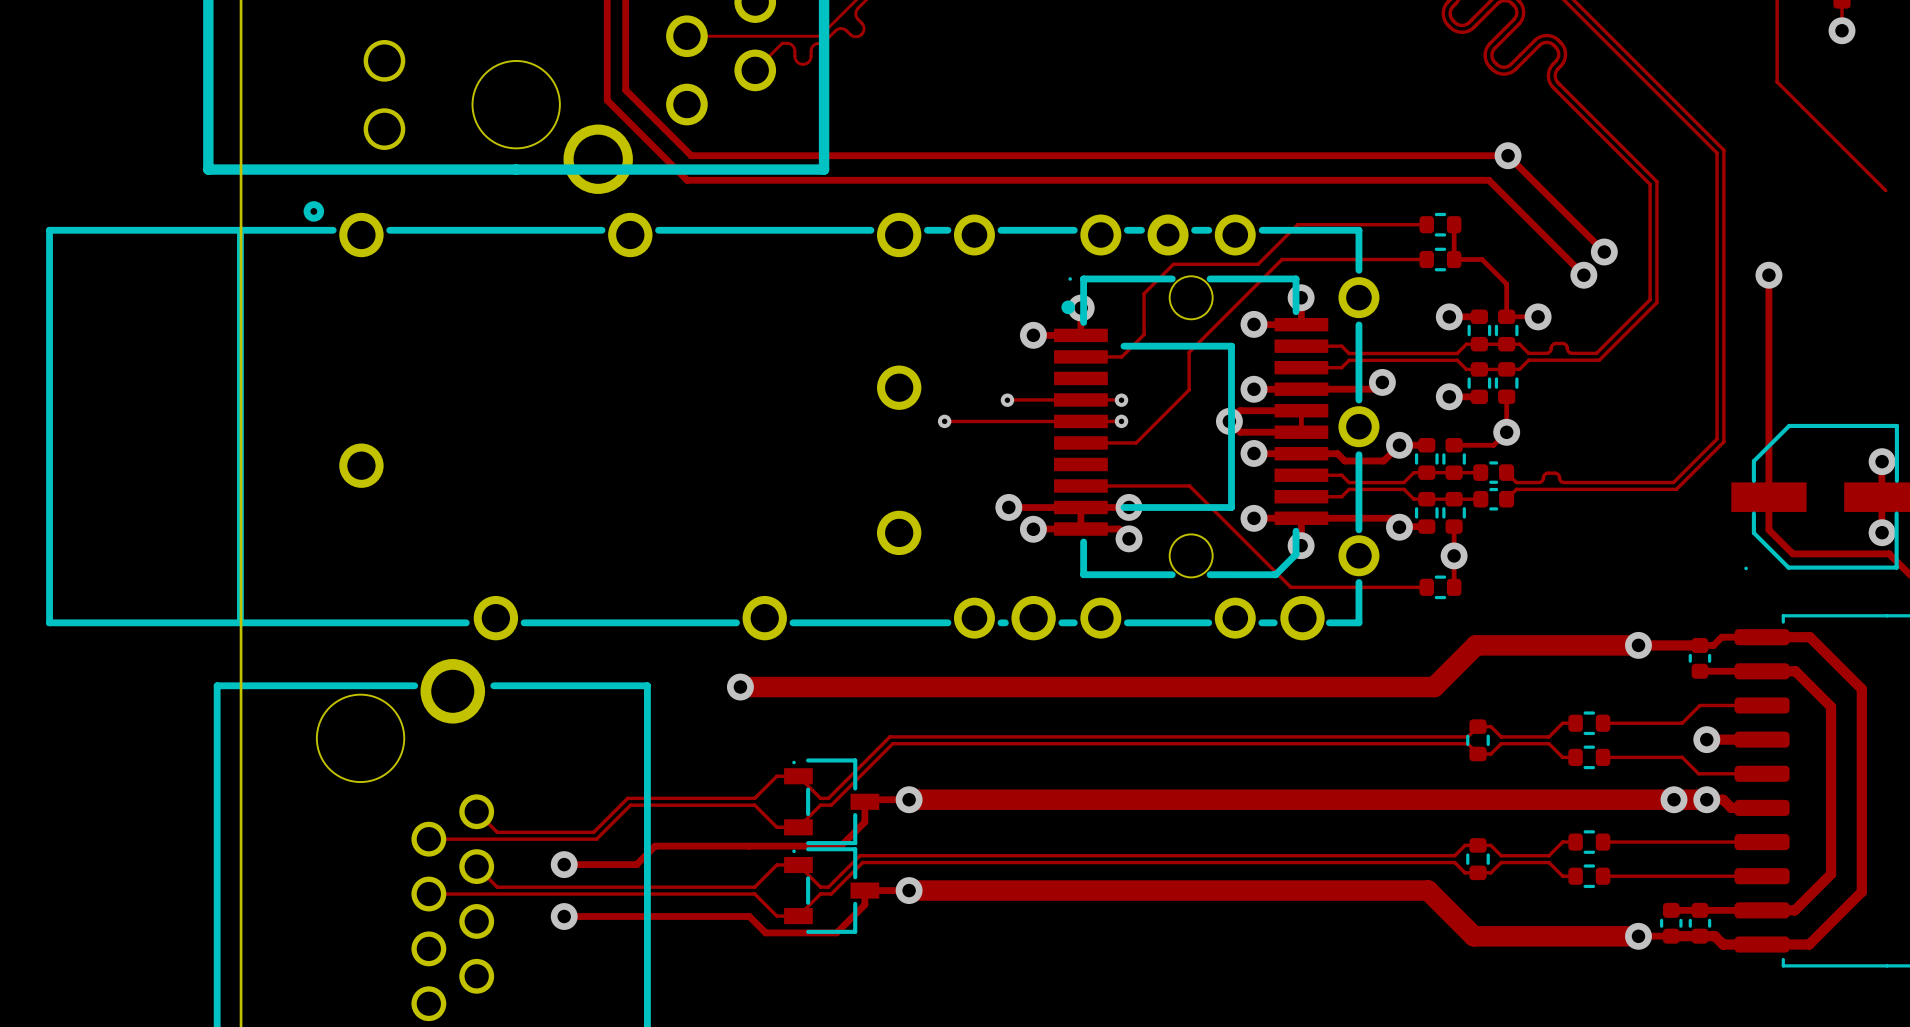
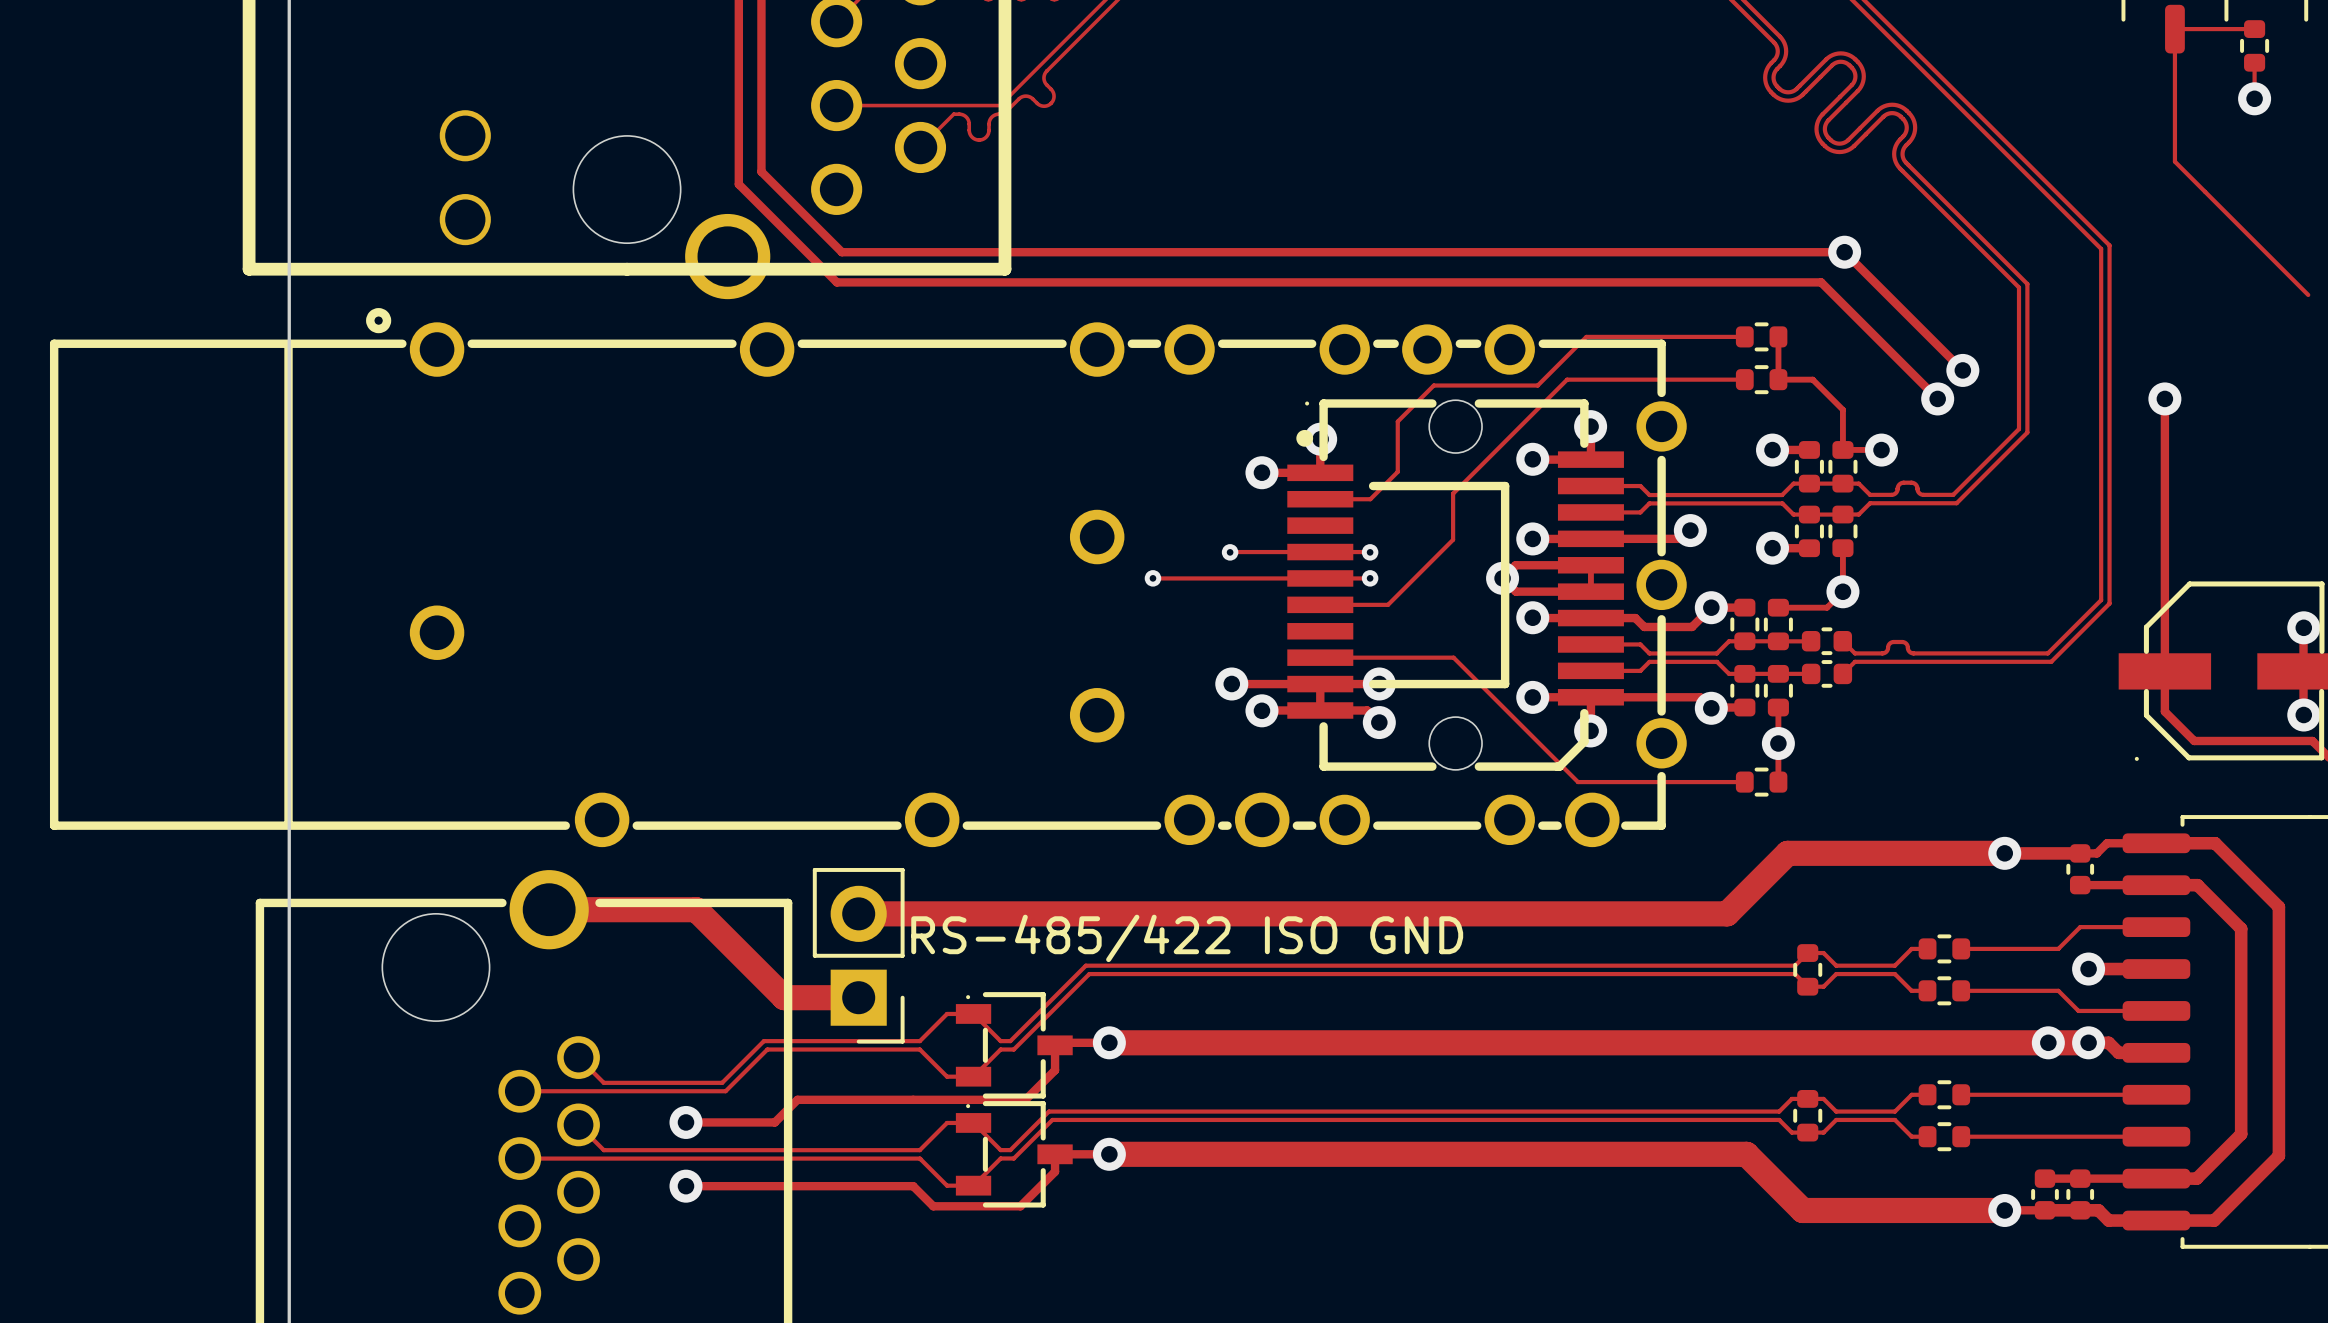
track: (1475, 645) (1434, 687) (740, 687) -> (1805, 853) (1787, 853) (1727, 913) (858, 913) (868, 904)
via: (740, 687) -> none
track: none -> (549, 909) (696, 909) (784, 997) (858, 997)
text: none -> RS-485/422 ISO GND (1187, 938)
part: none -> (858, 955)

